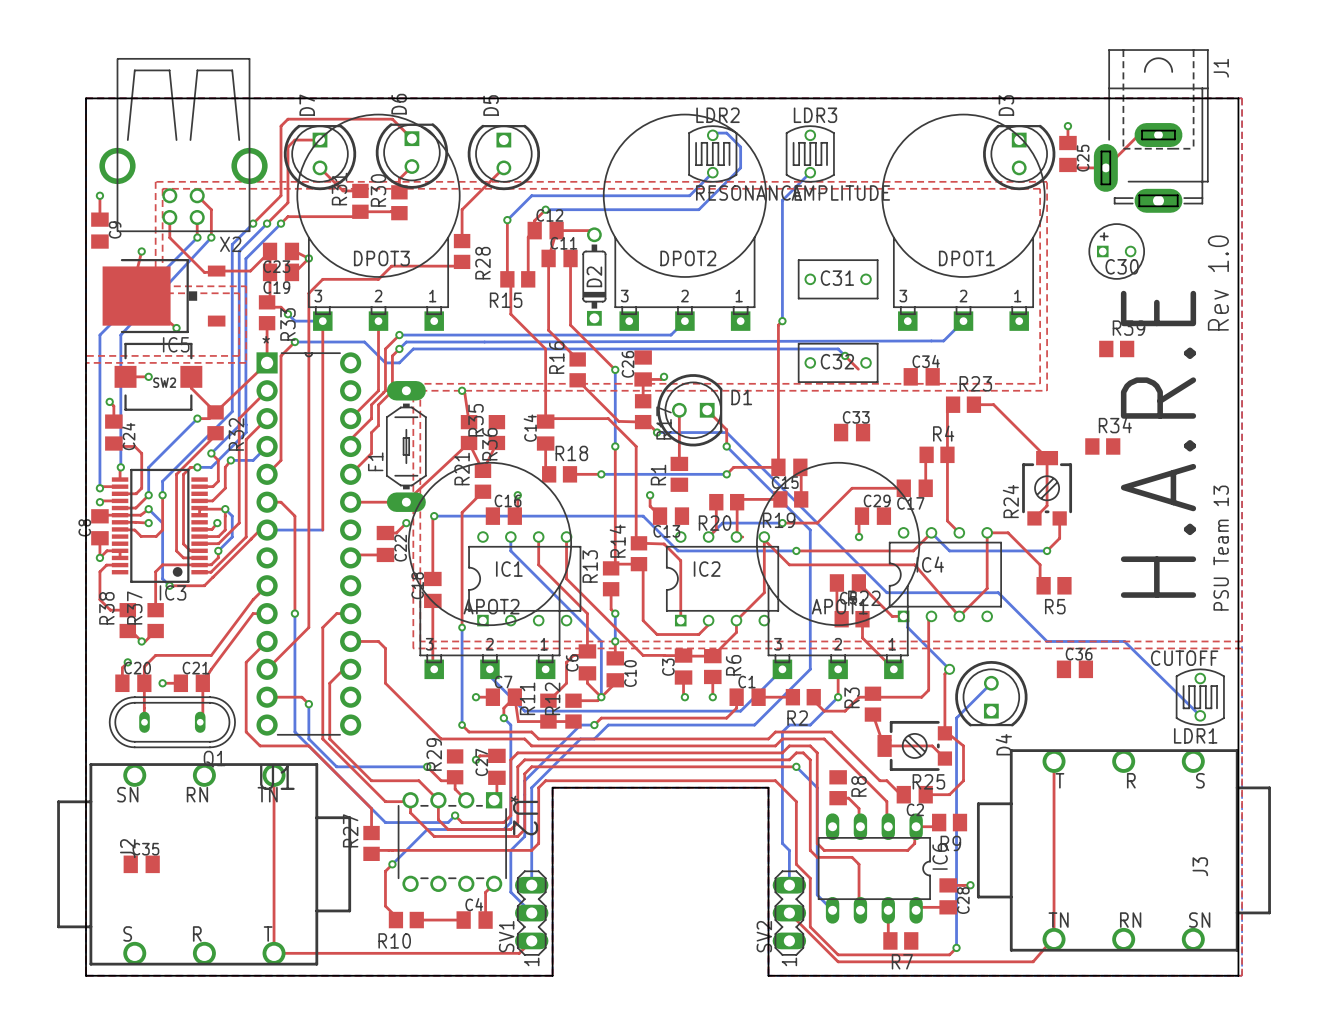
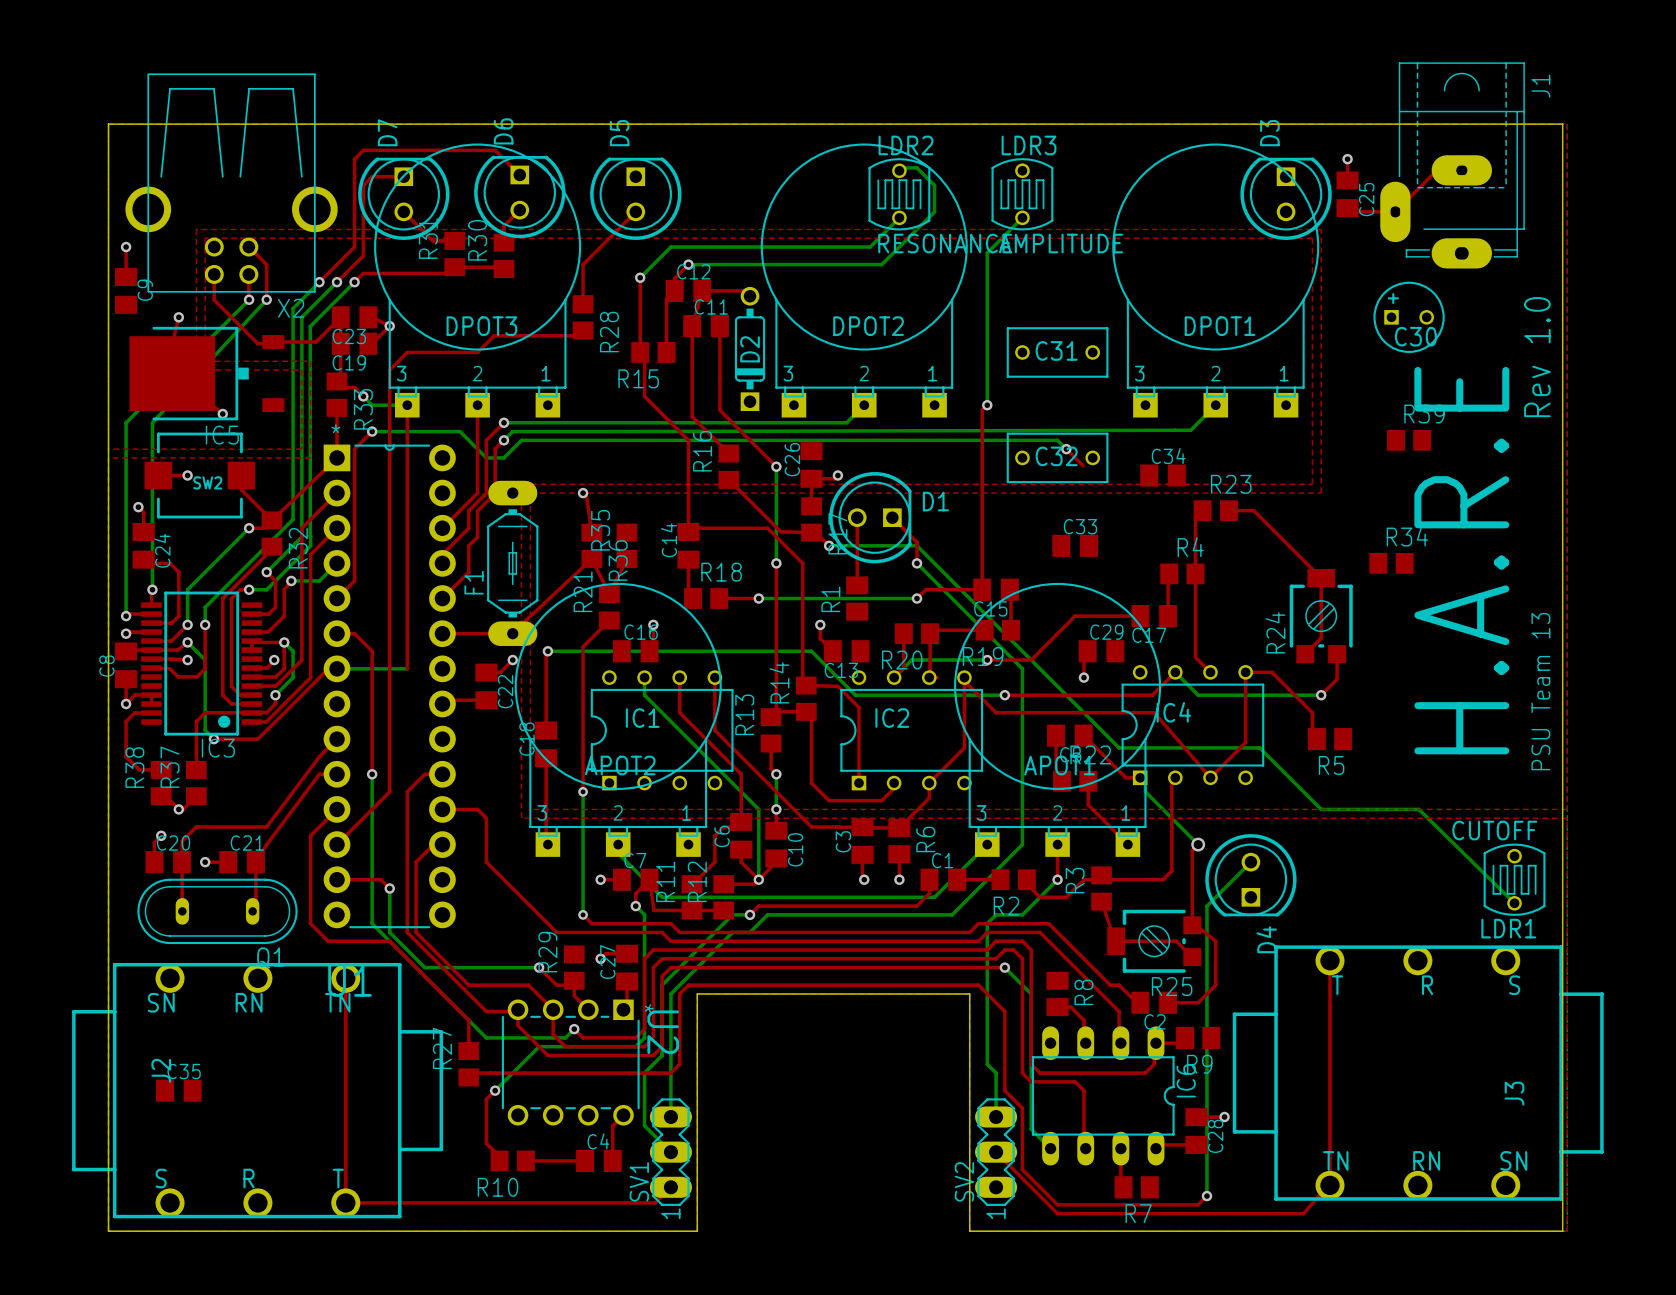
C36: (1074, 669) -> none

